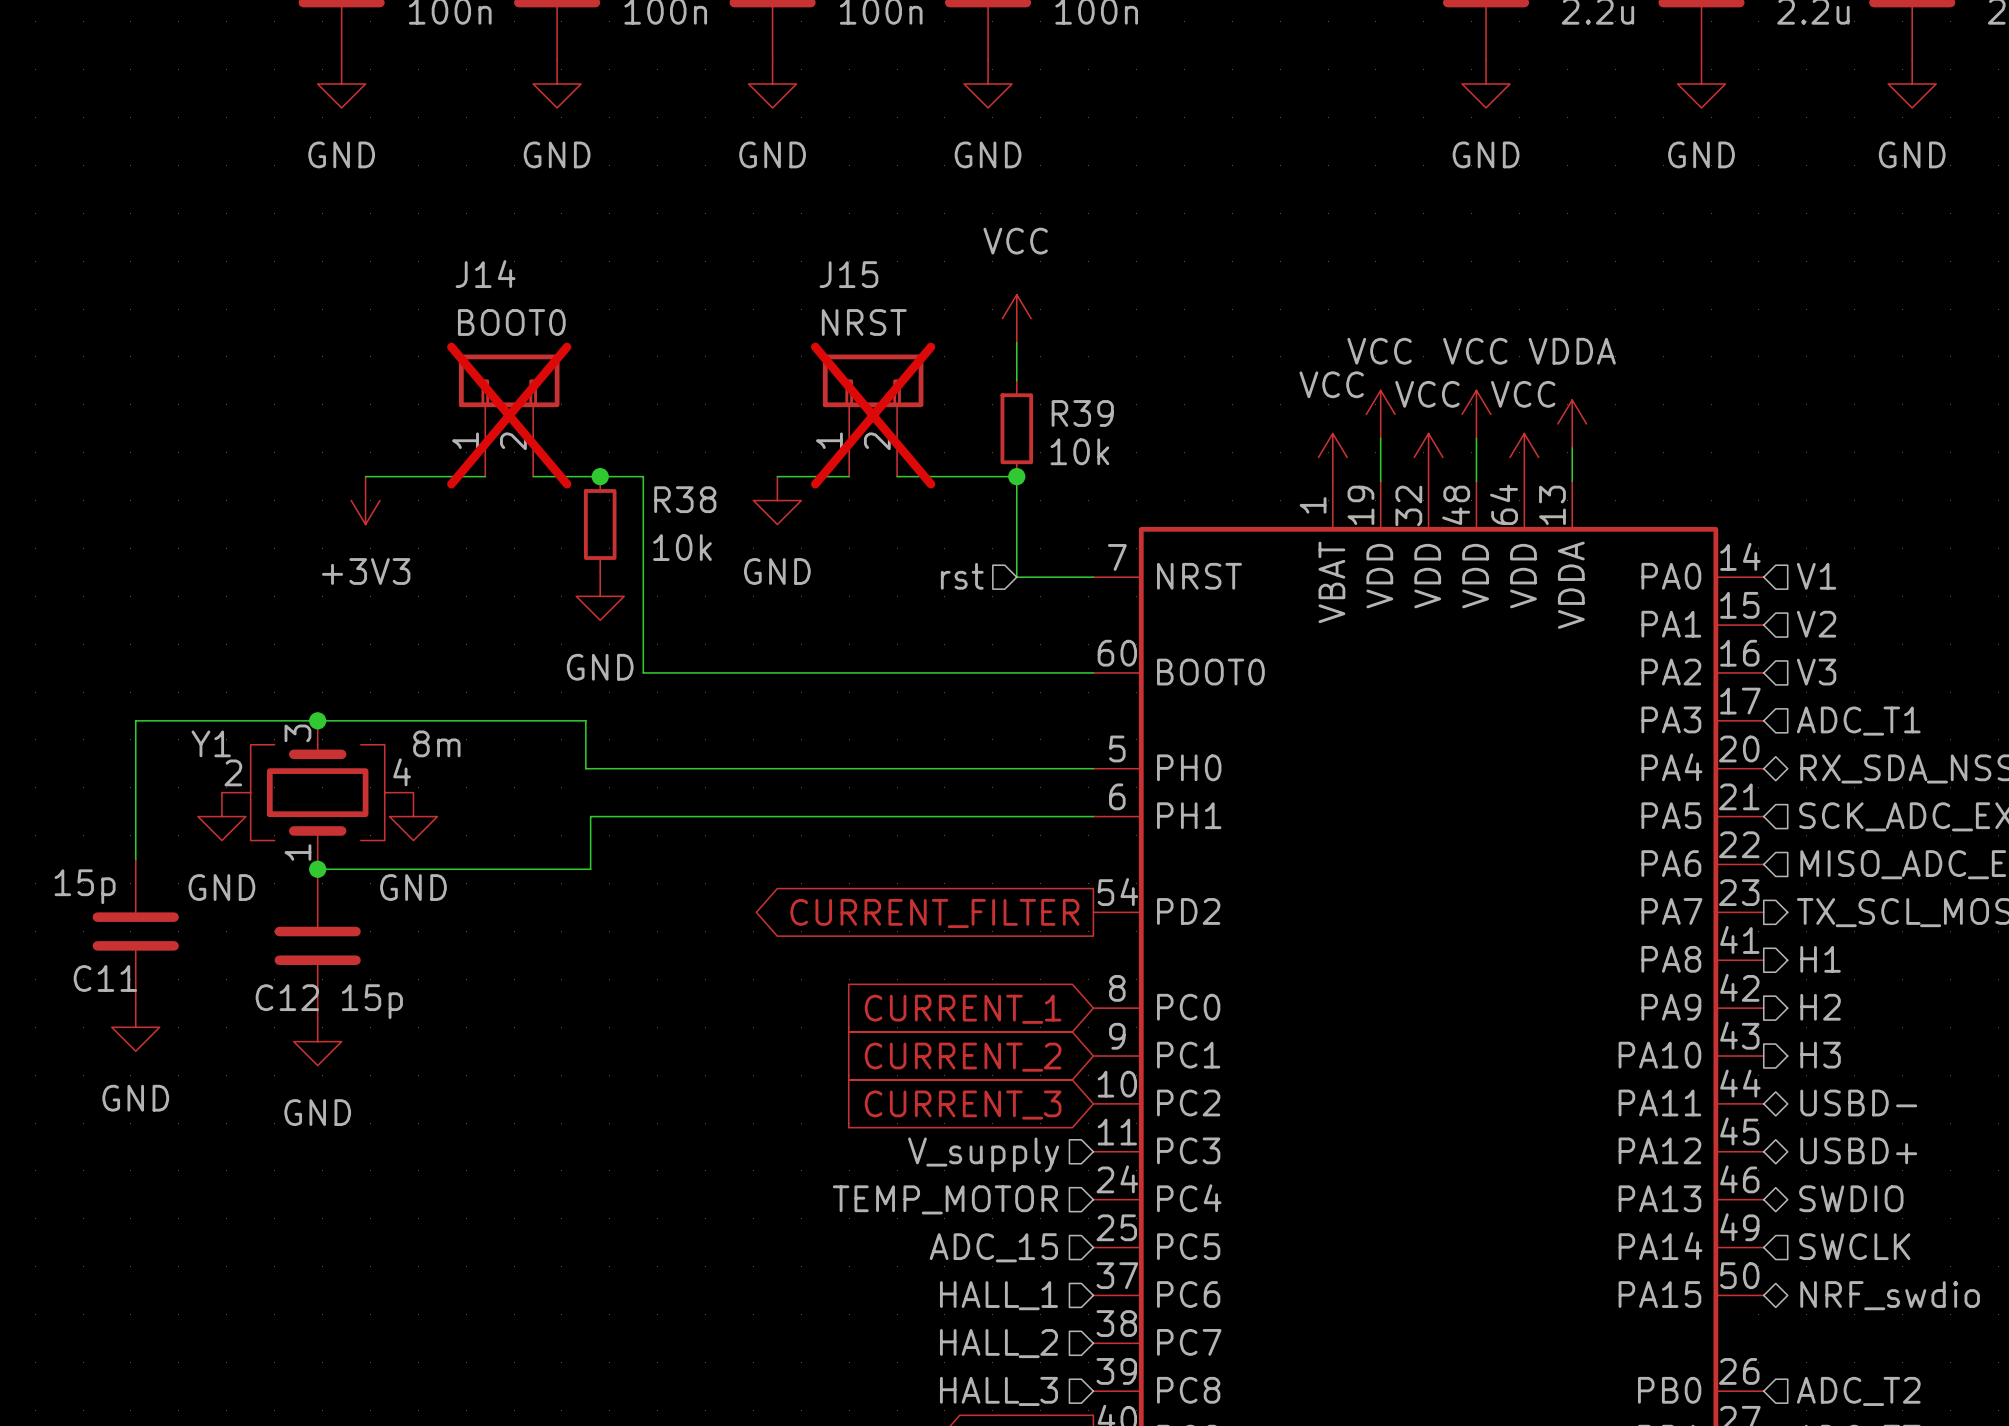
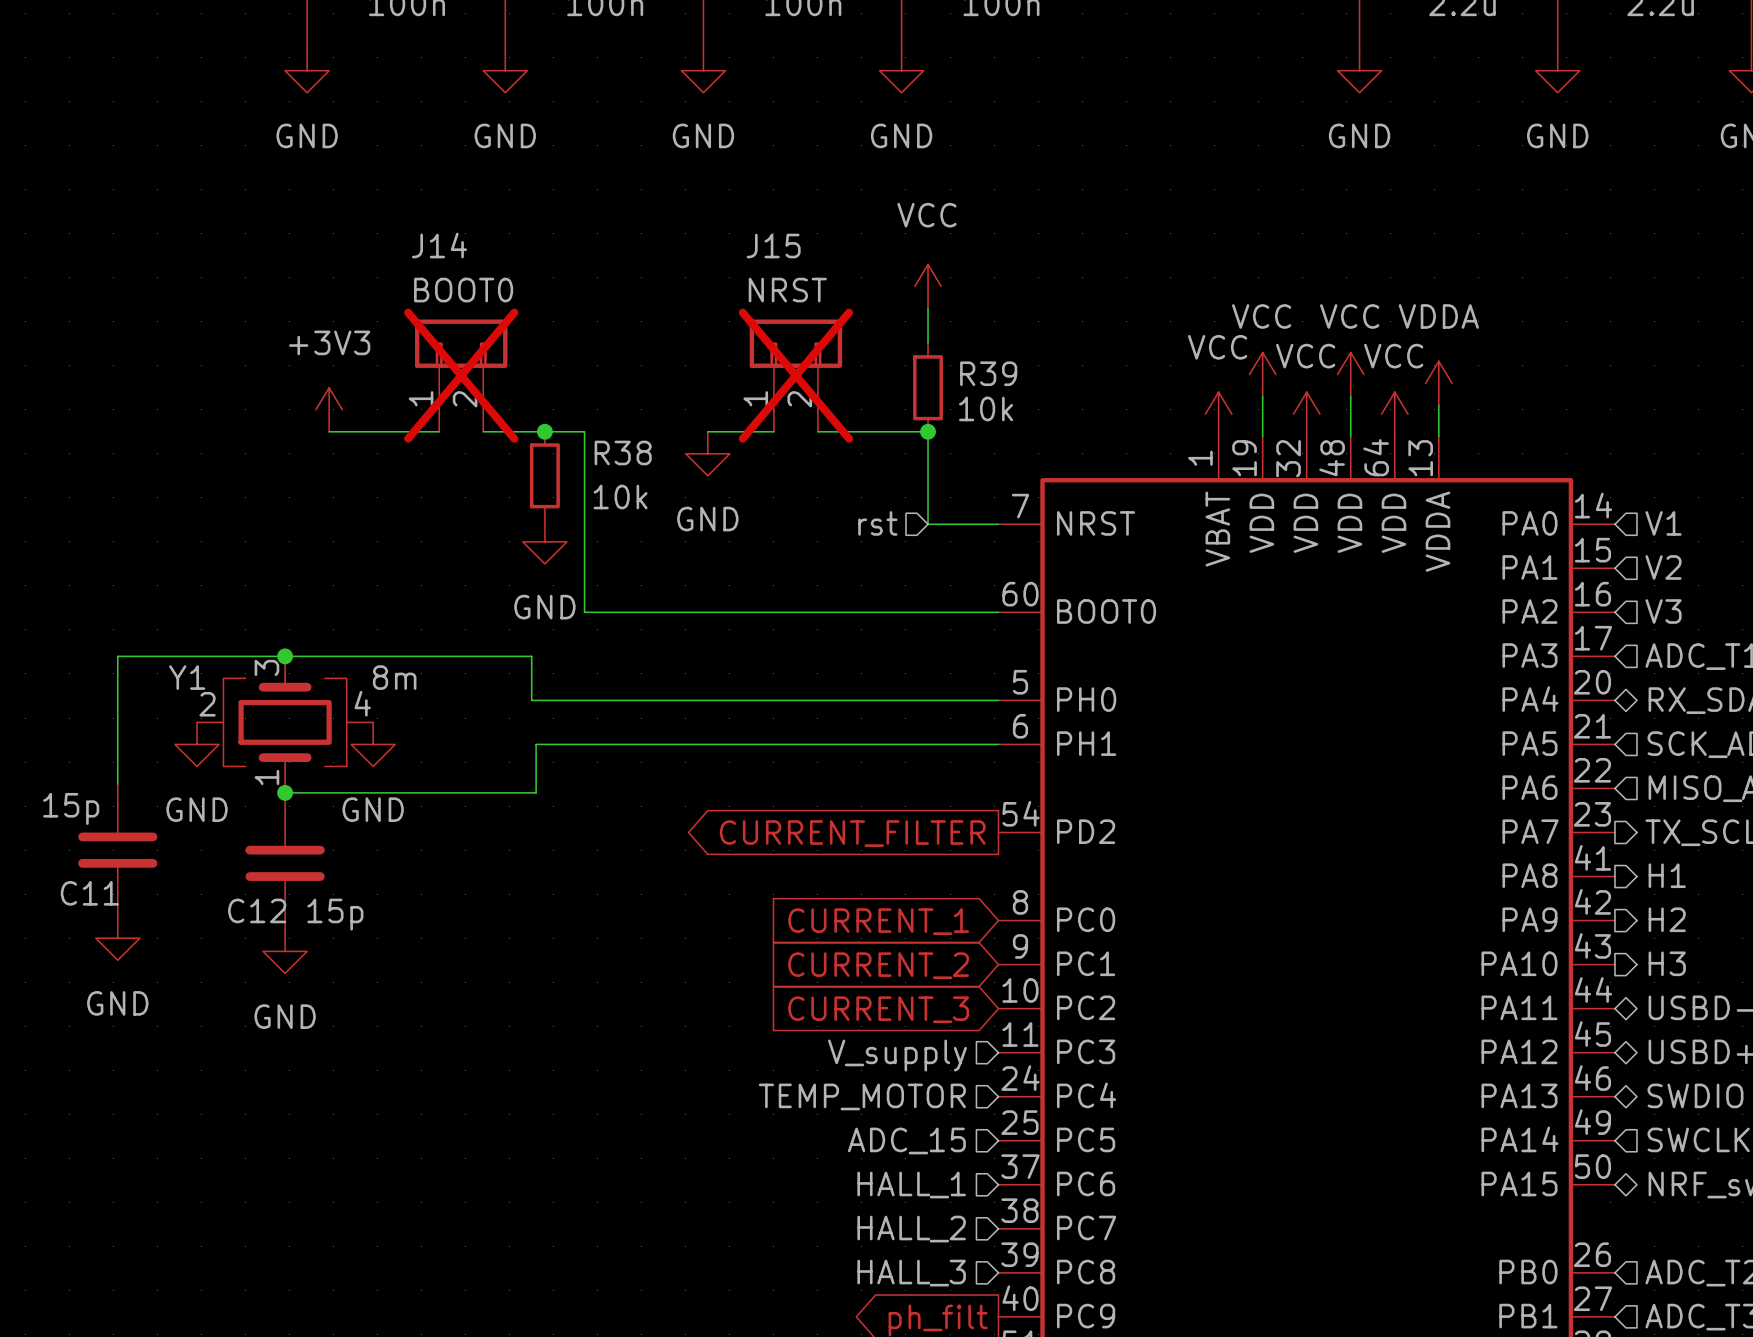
power symbol rotation: 0° (365, 500) -> 180° (329, 409)
power symbol position: +3V3 (365, 500) -> +3V3 (329, 409)

